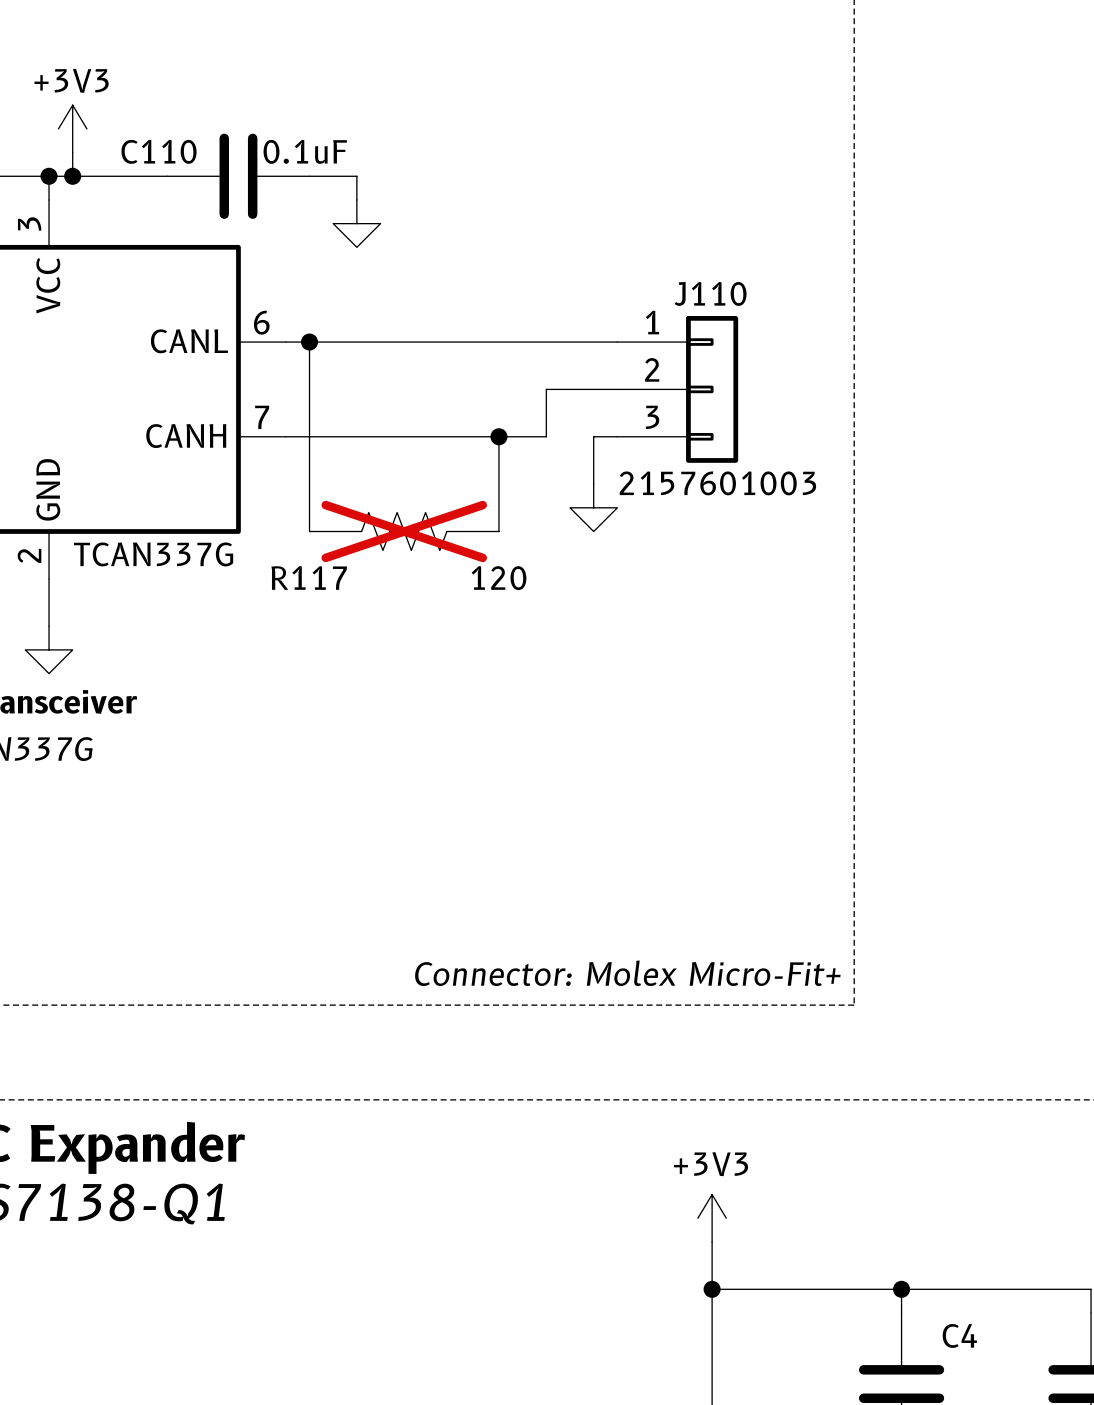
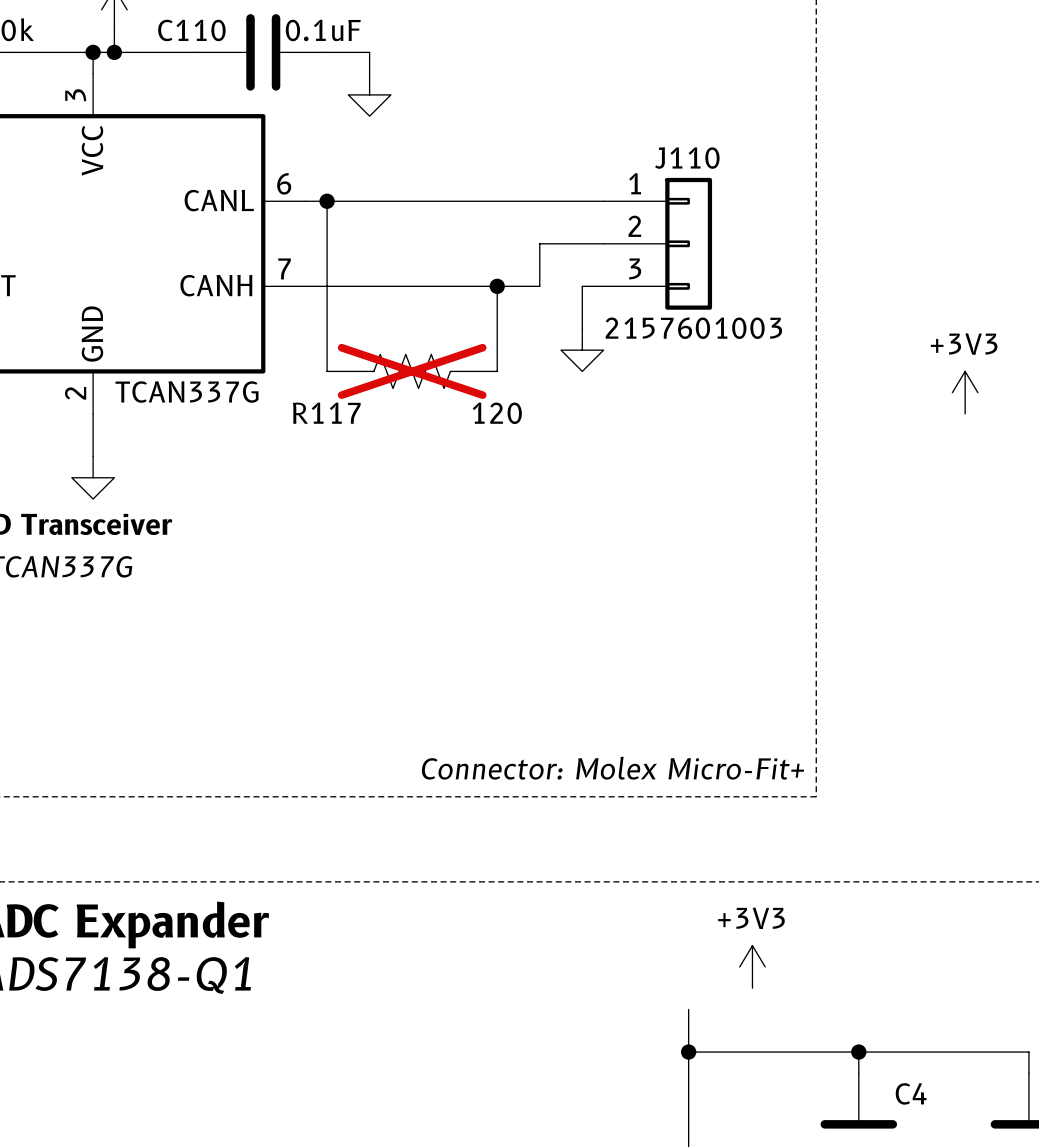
power symbol: none -> +3V3 (965, 392)
power symbol position: +3V3 (712, 1218) -> +3V3 (752, 966)

